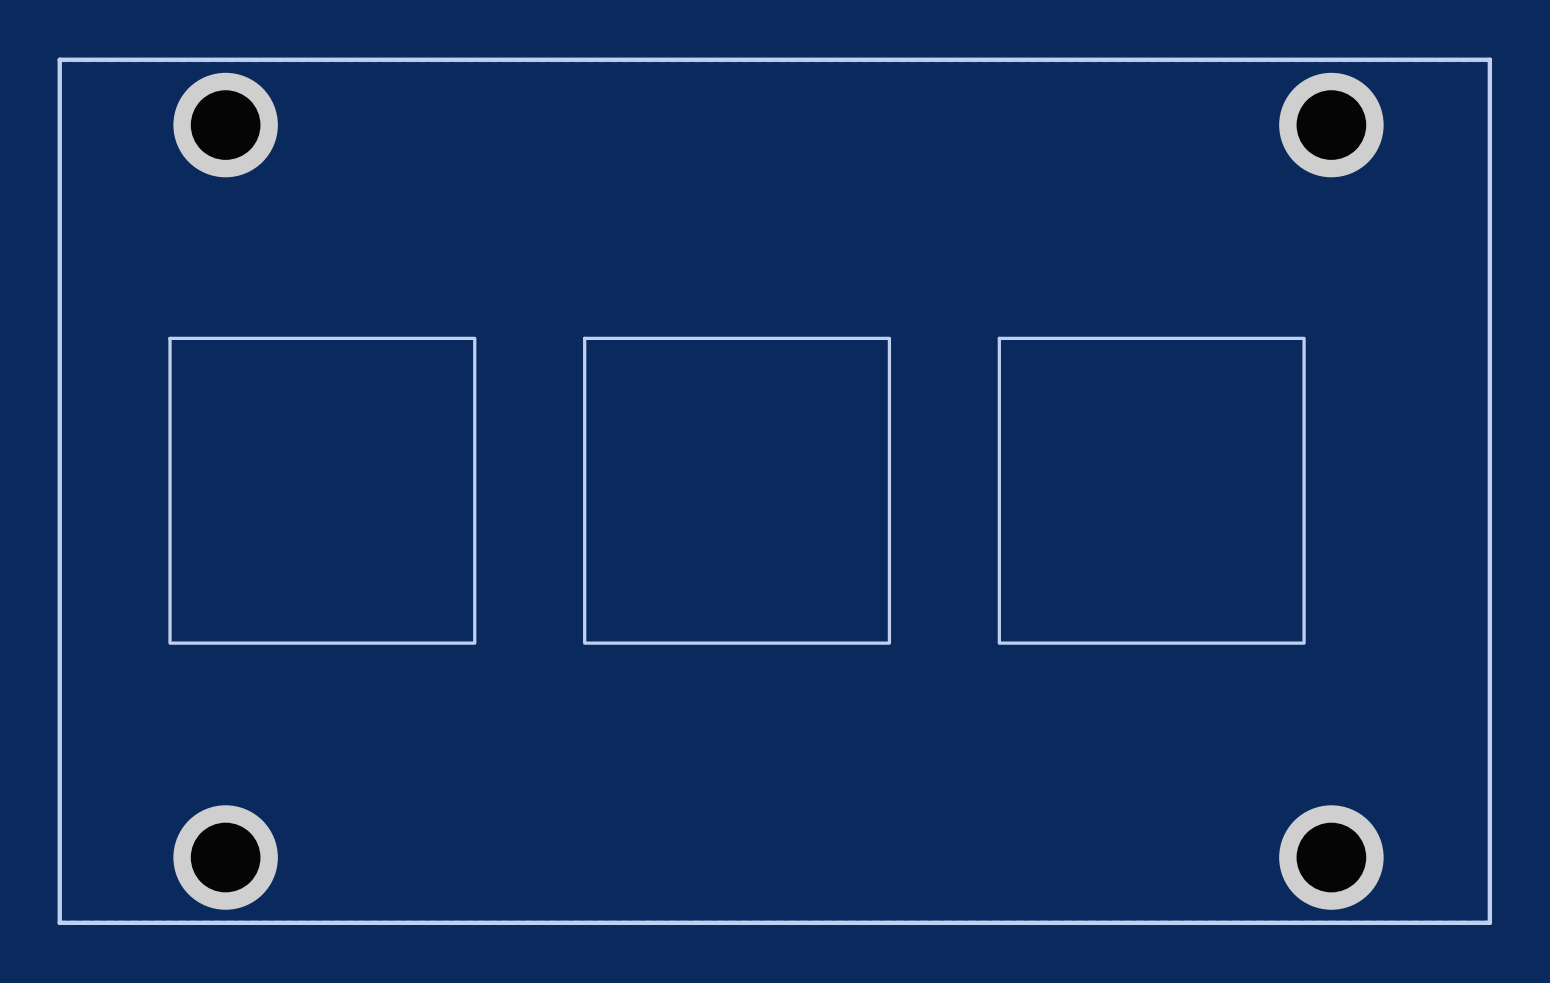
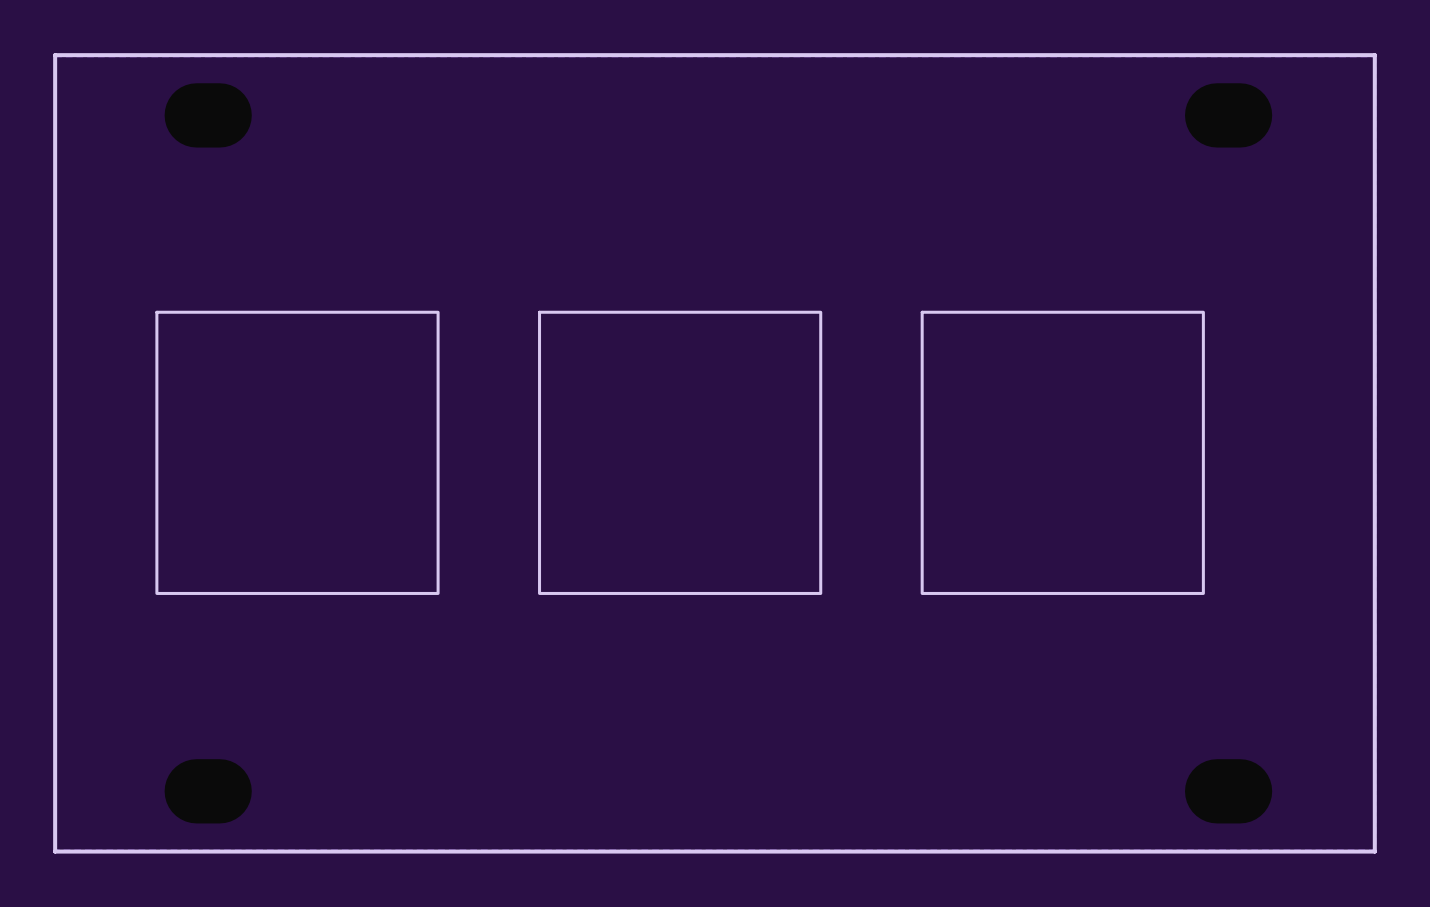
part footprint: [173, 72, 278, 178] -> [164, 83, 252, 148]
part footprint: [1279, 72, 1384, 178] -> [1185, 83, 1273, 148]
part footprint: [173, 805, 278, 910] -> [164, 759, 252, 824]
part footprint: [1279, 805, 1384, 910] -> [1185, 759, 1273, 824]

